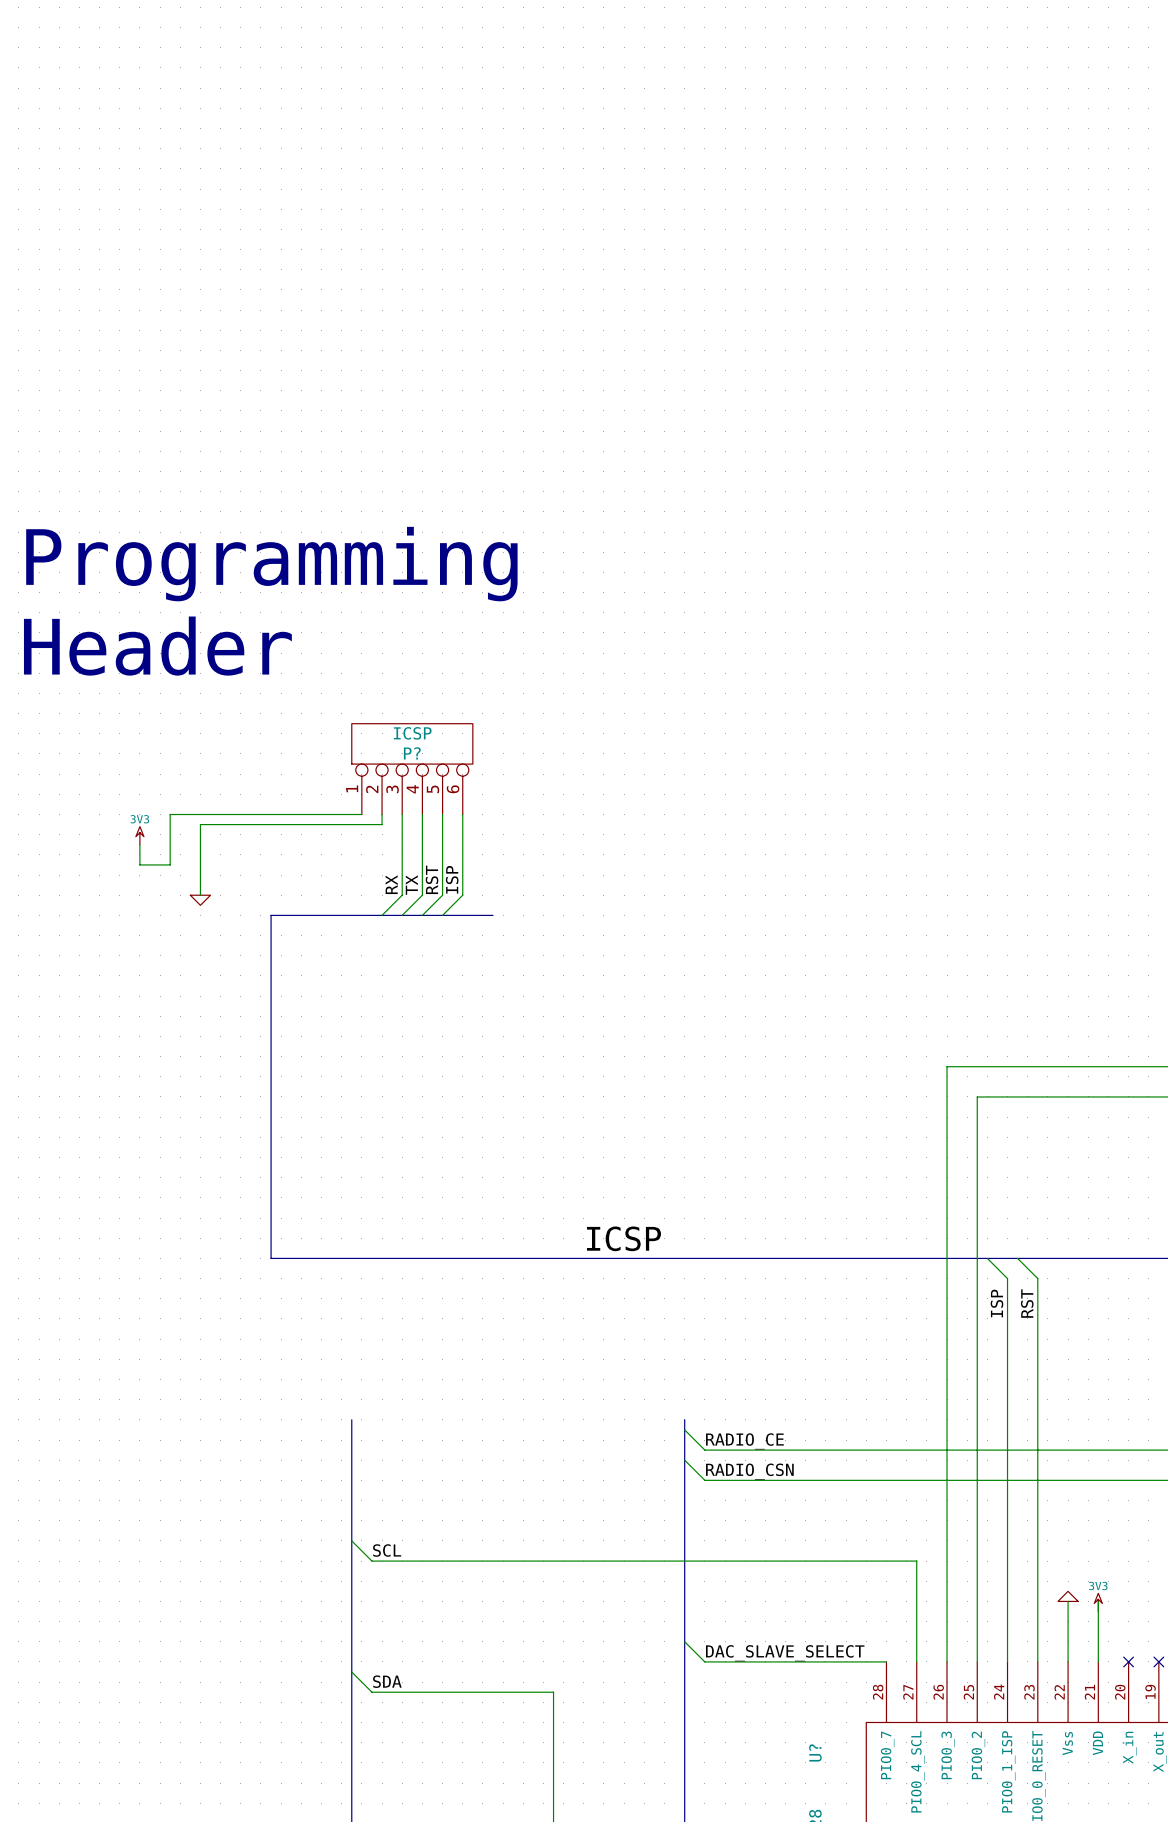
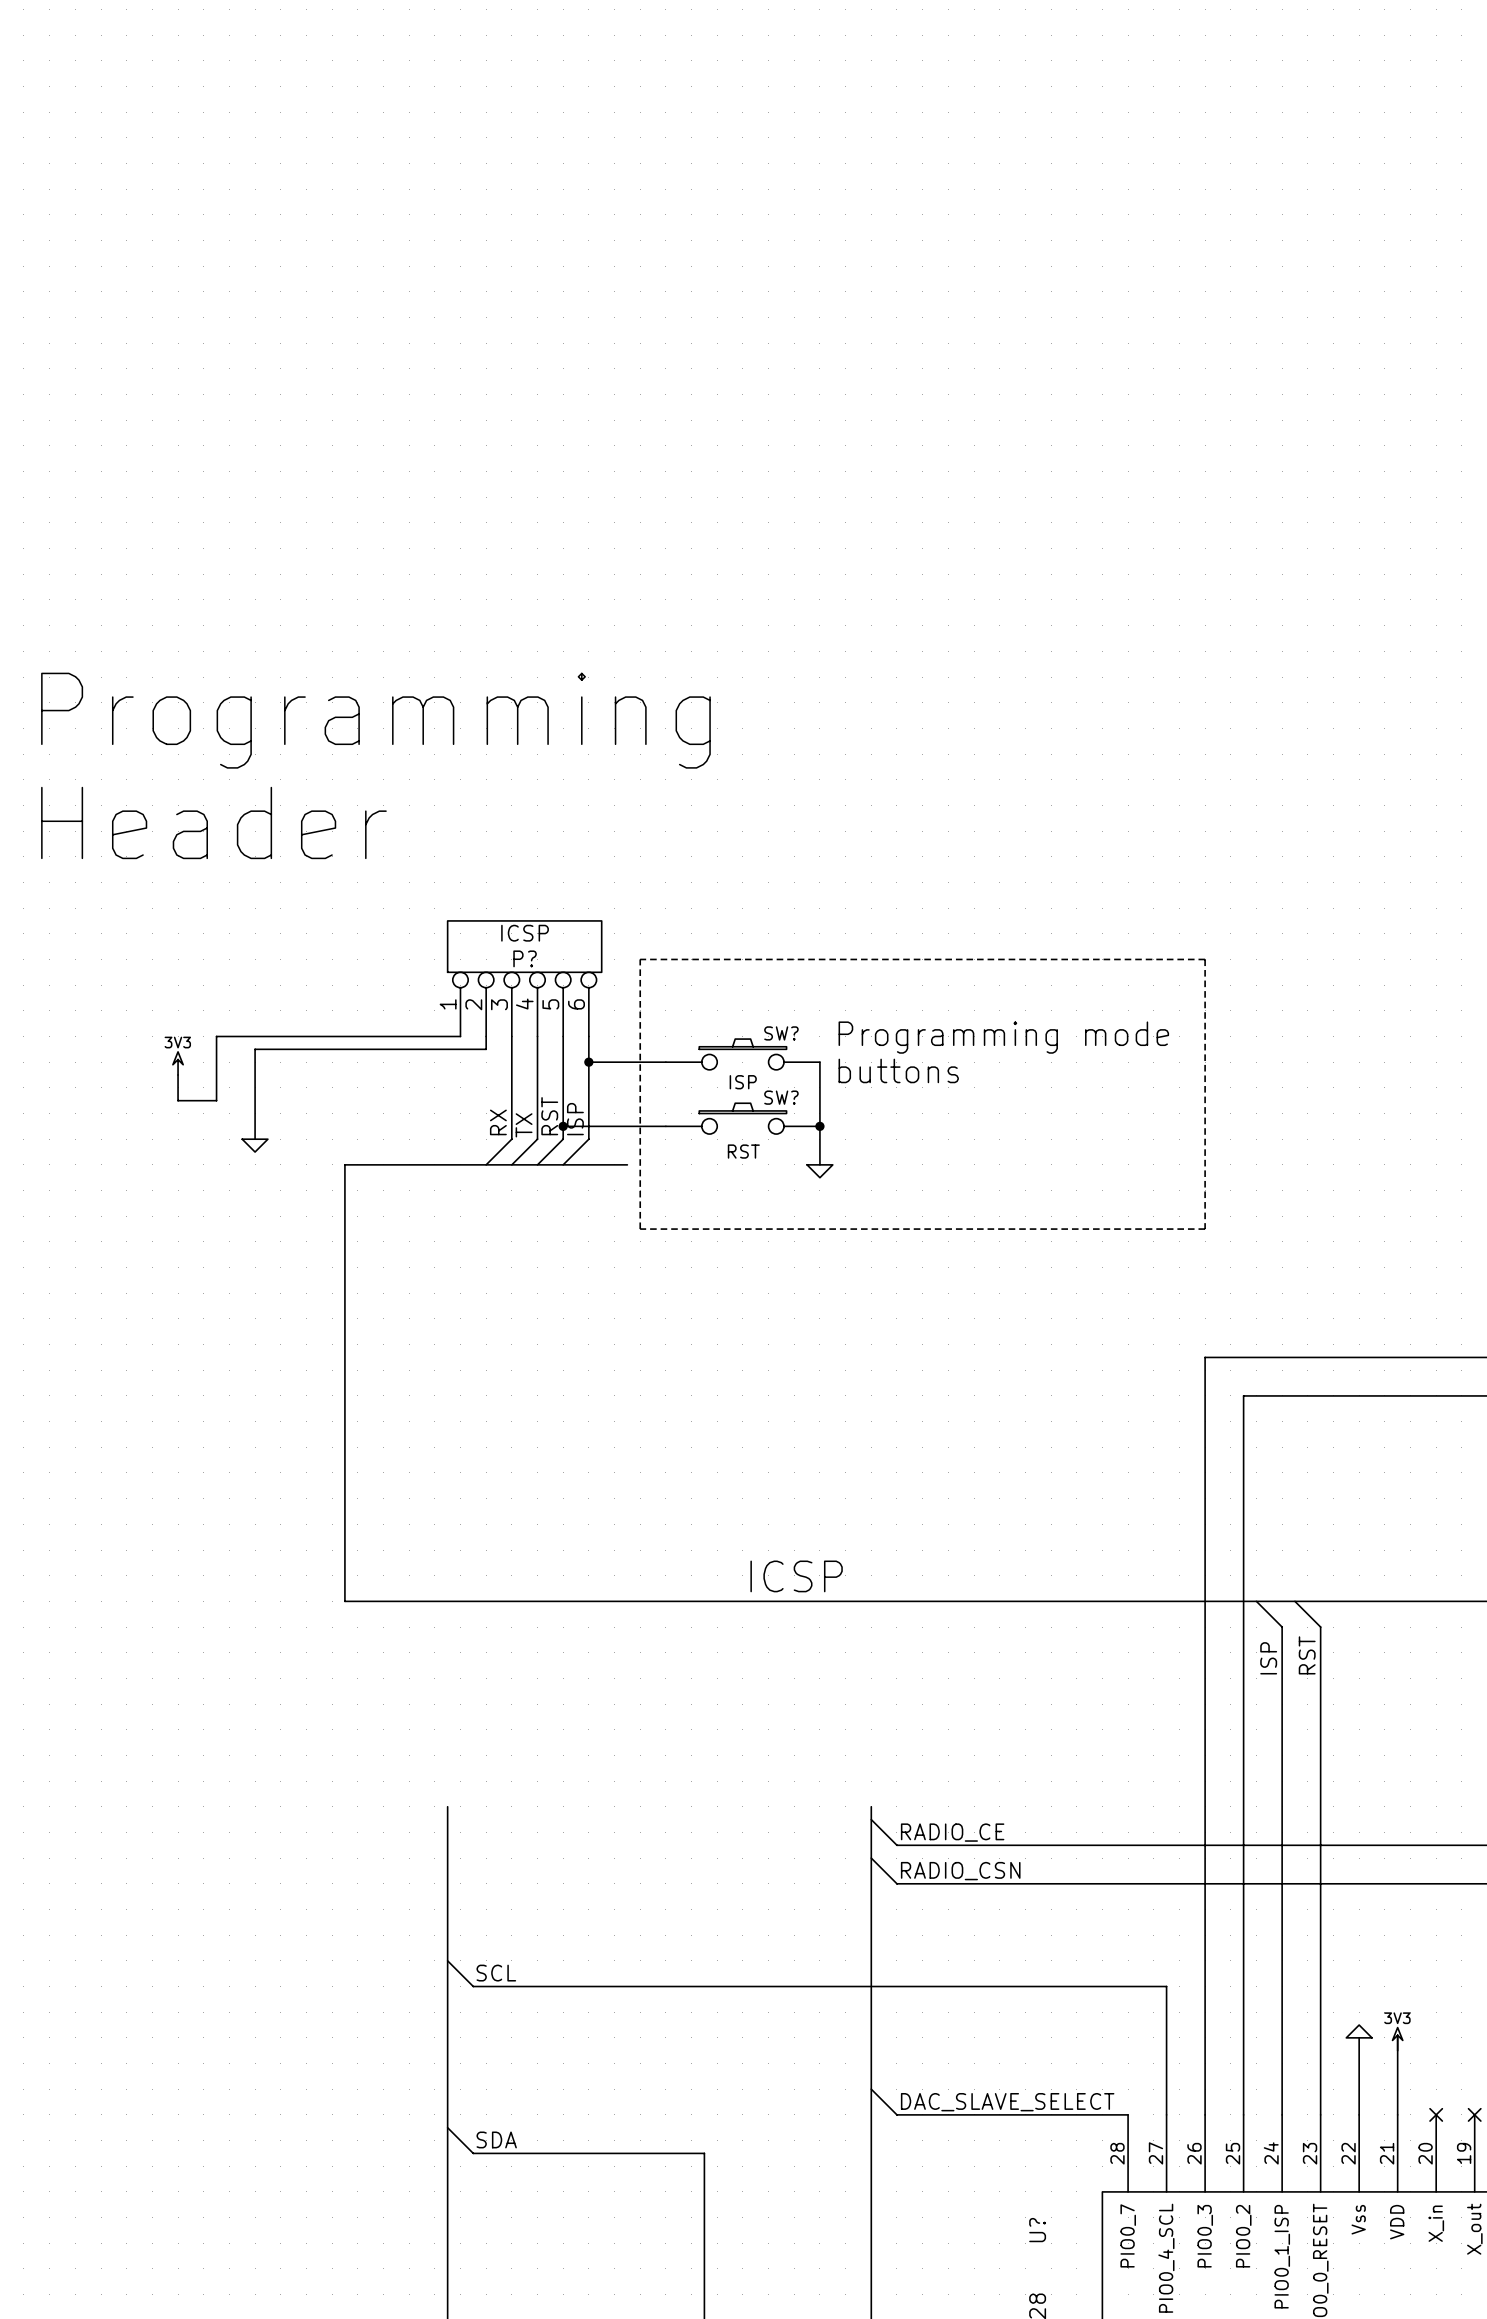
line: none -> (640, 959) (1205, 959) (1205, 1229) (640, 1229) (640, 959)
text: none -> Programming mode (1003, 1037)
SW?: none -> ISP (742, 1054)
wire: none -> (588, 1062) (665, 1062)
junction: none -> (588, 1062)
wire: none -> (819, 1062) (819, 1164)
text: none -> buttons (898, 1070)
SW?: none -> RST (742, 1118)
wire: none -> (563, 1126) (665, 1126)
junction: none -> (563, 1126)
junction: none -> (819, 1126)
power symbol: none -> (819, 1171)

